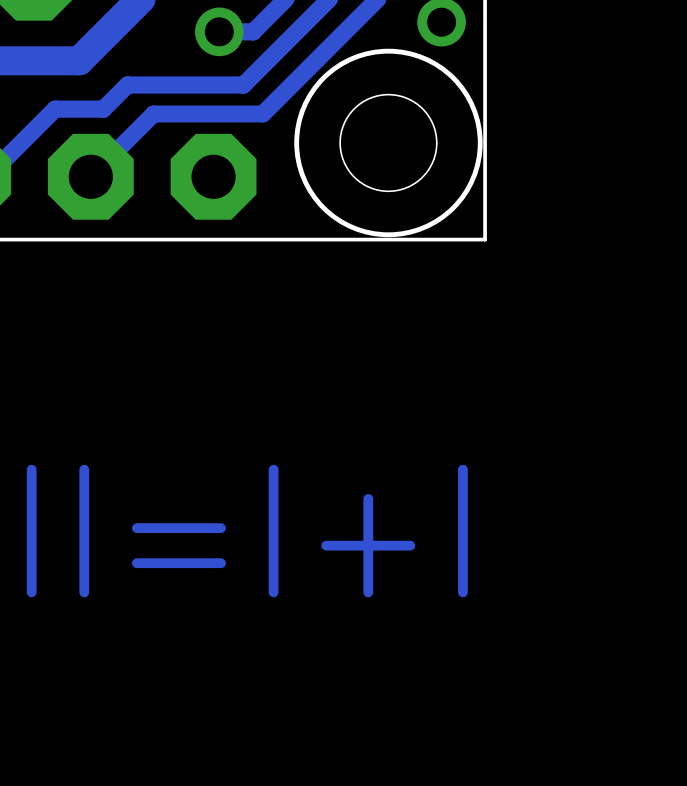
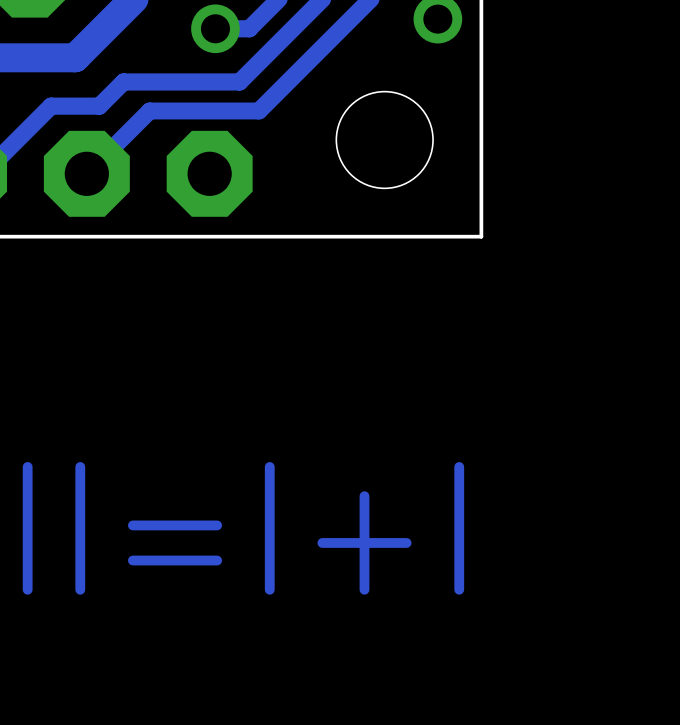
round board edge: [294, 48, 483, 238] -> none

